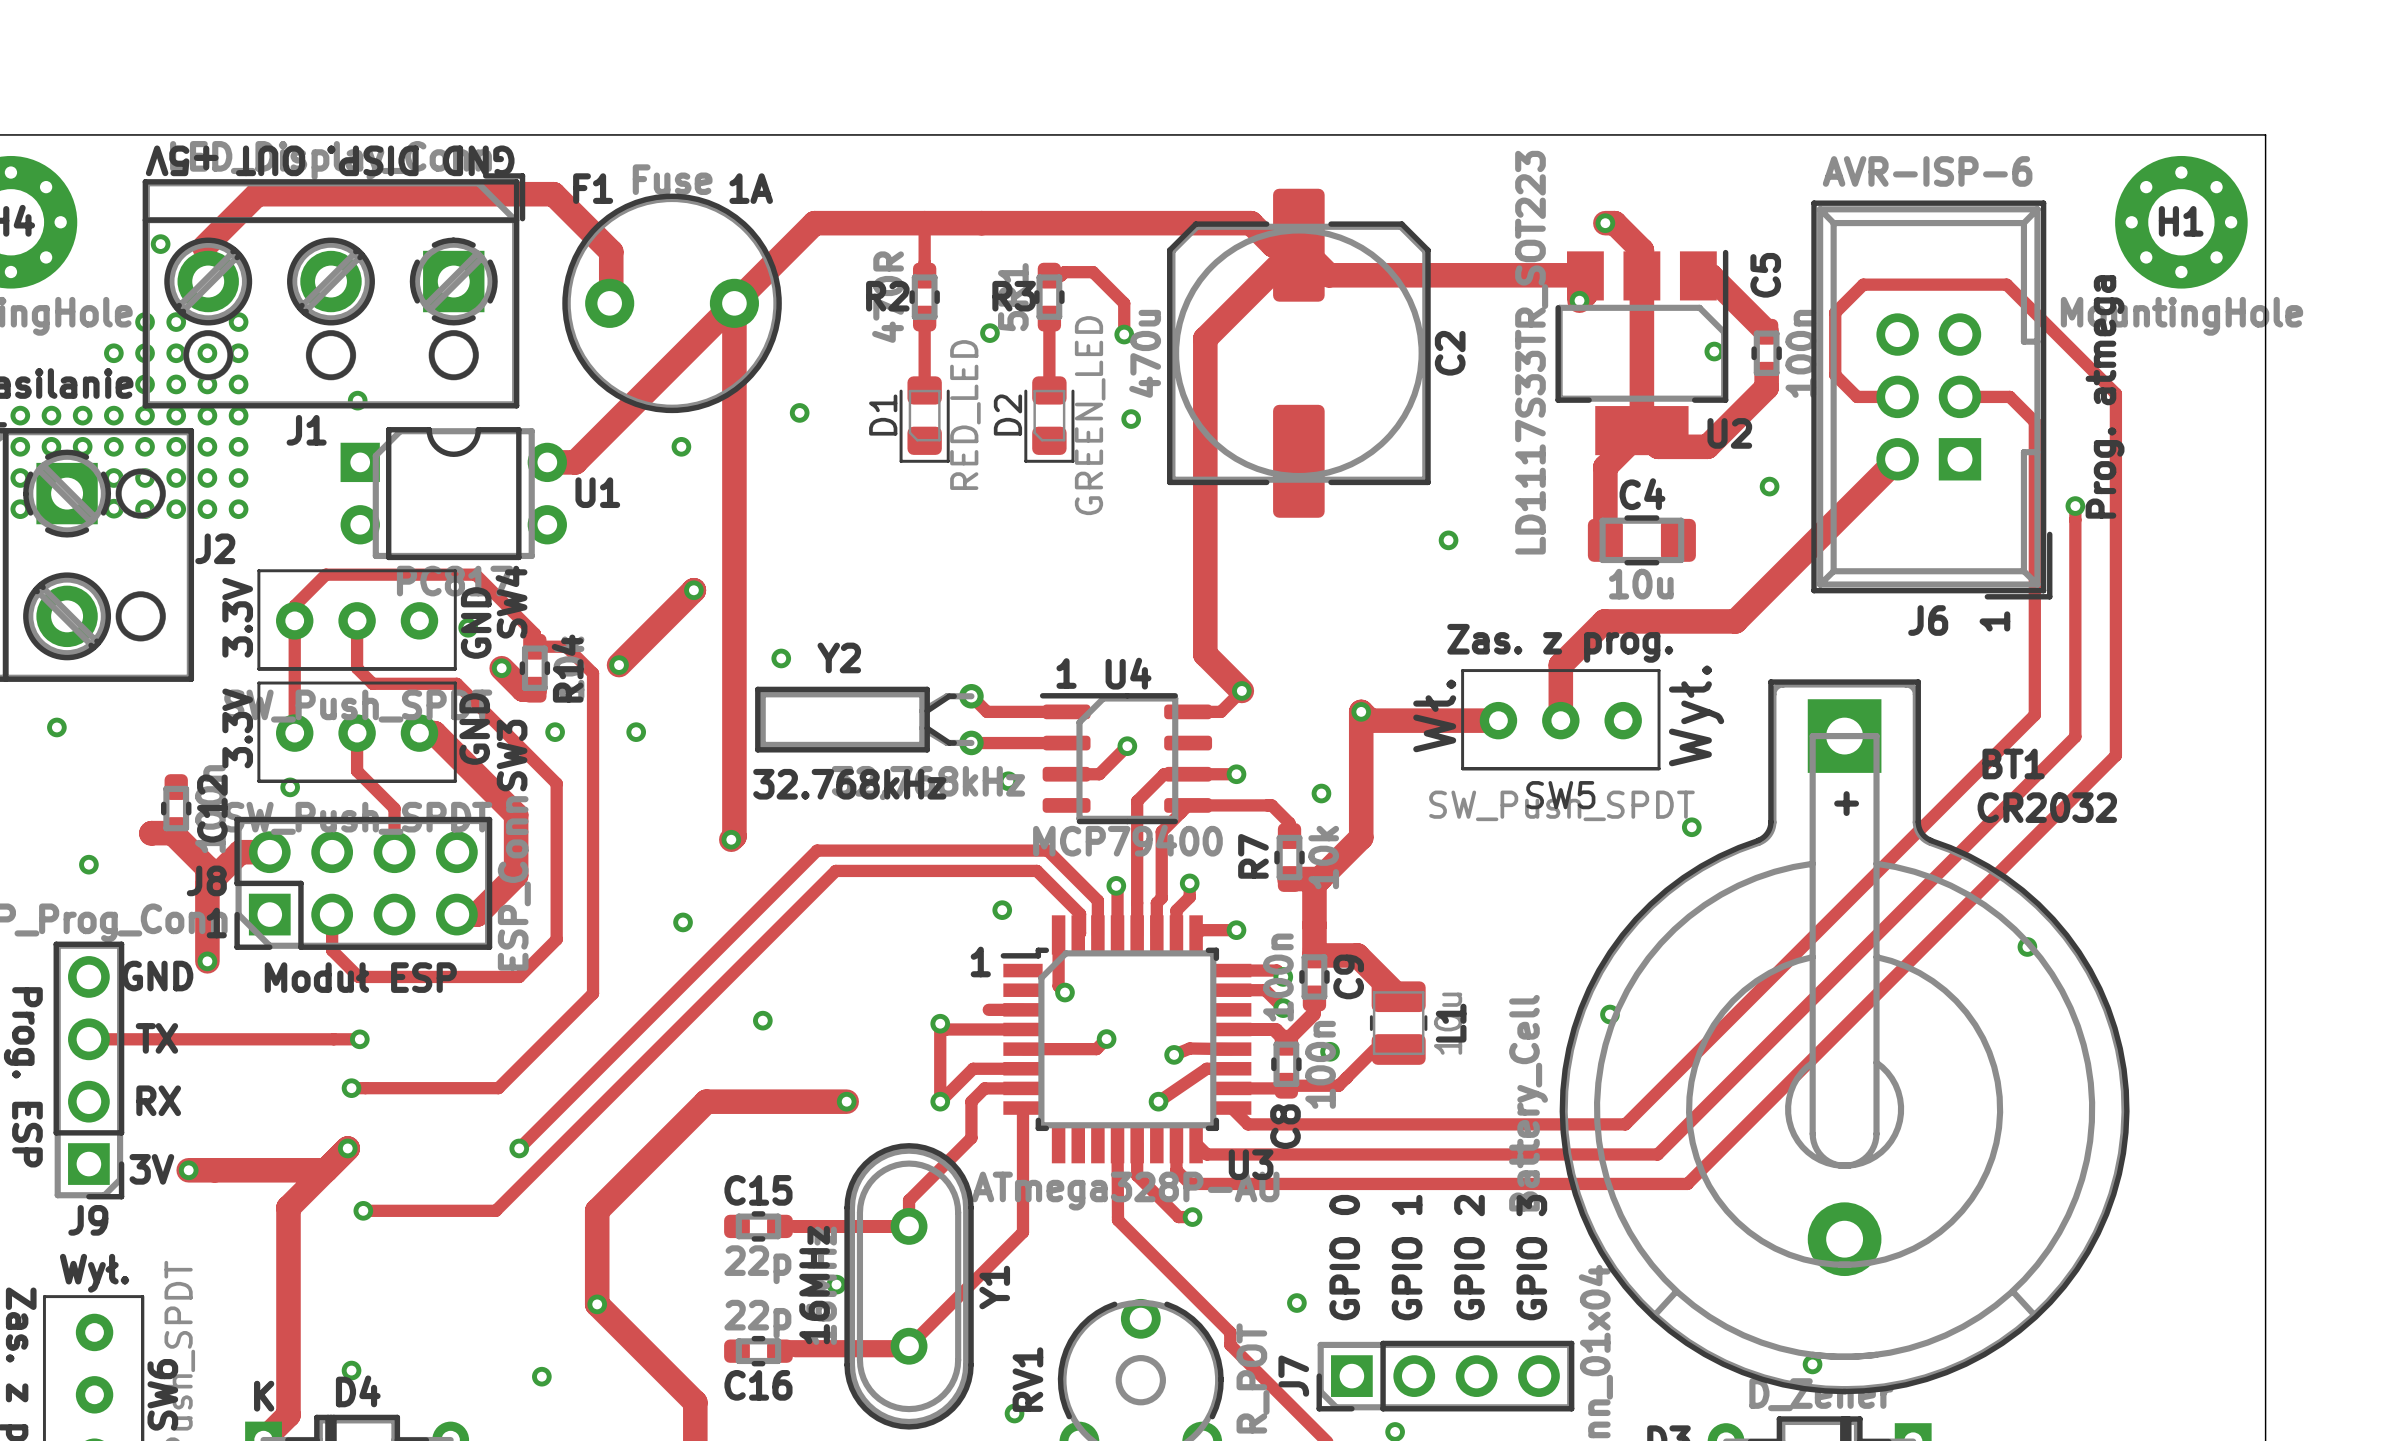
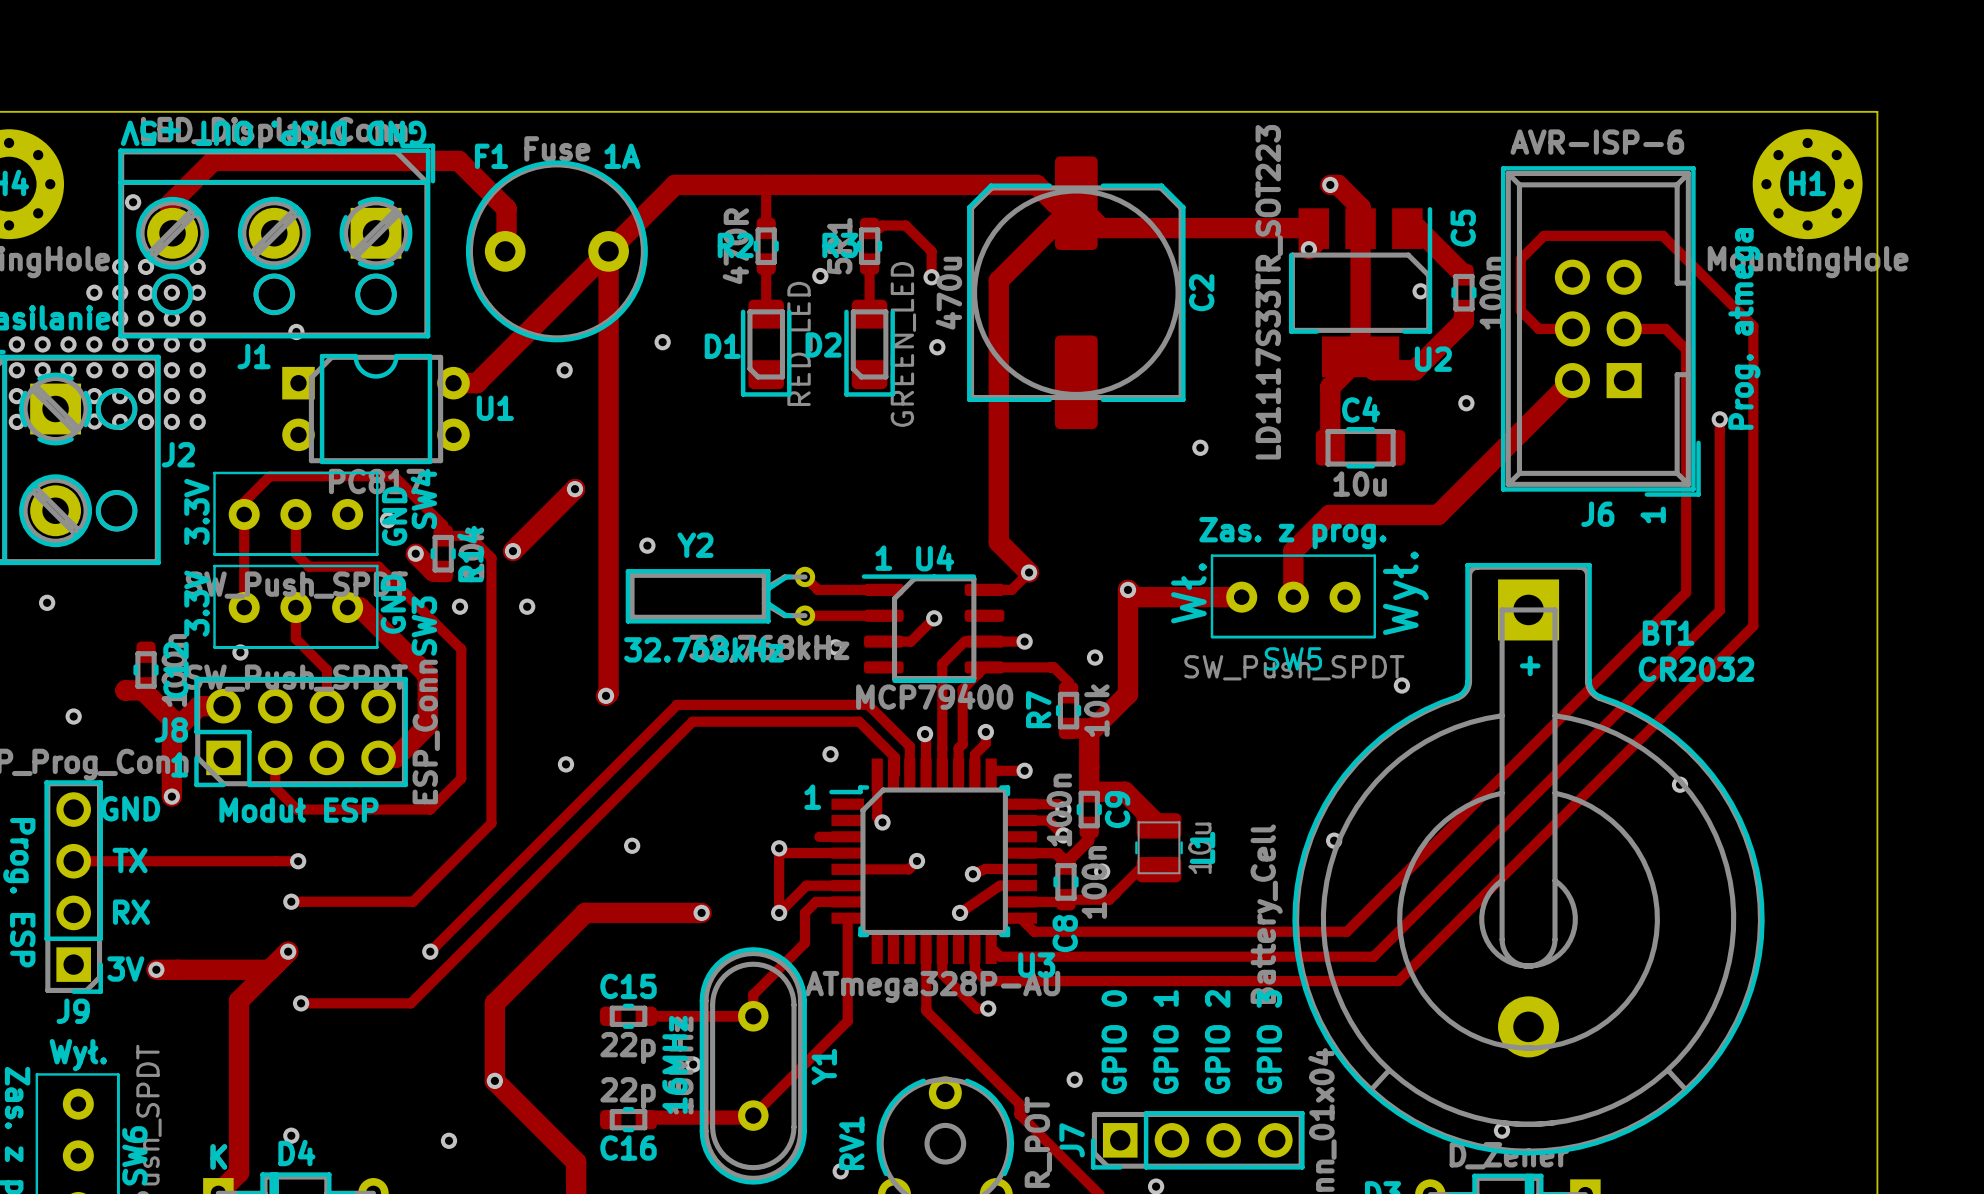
D1 footprint: [899, 376, 950, 463] -> [740, 299, 792, 397]
D2 footprint: [1024, 376, 1075, 463] -> [844, 299, 895, 397]
D1 name rotation: 0° (883, 415) -> 90° clockwise (722, 346)
D2 name rotation: 0° (1007, 415) -> 90° clockwise (823, 344)

